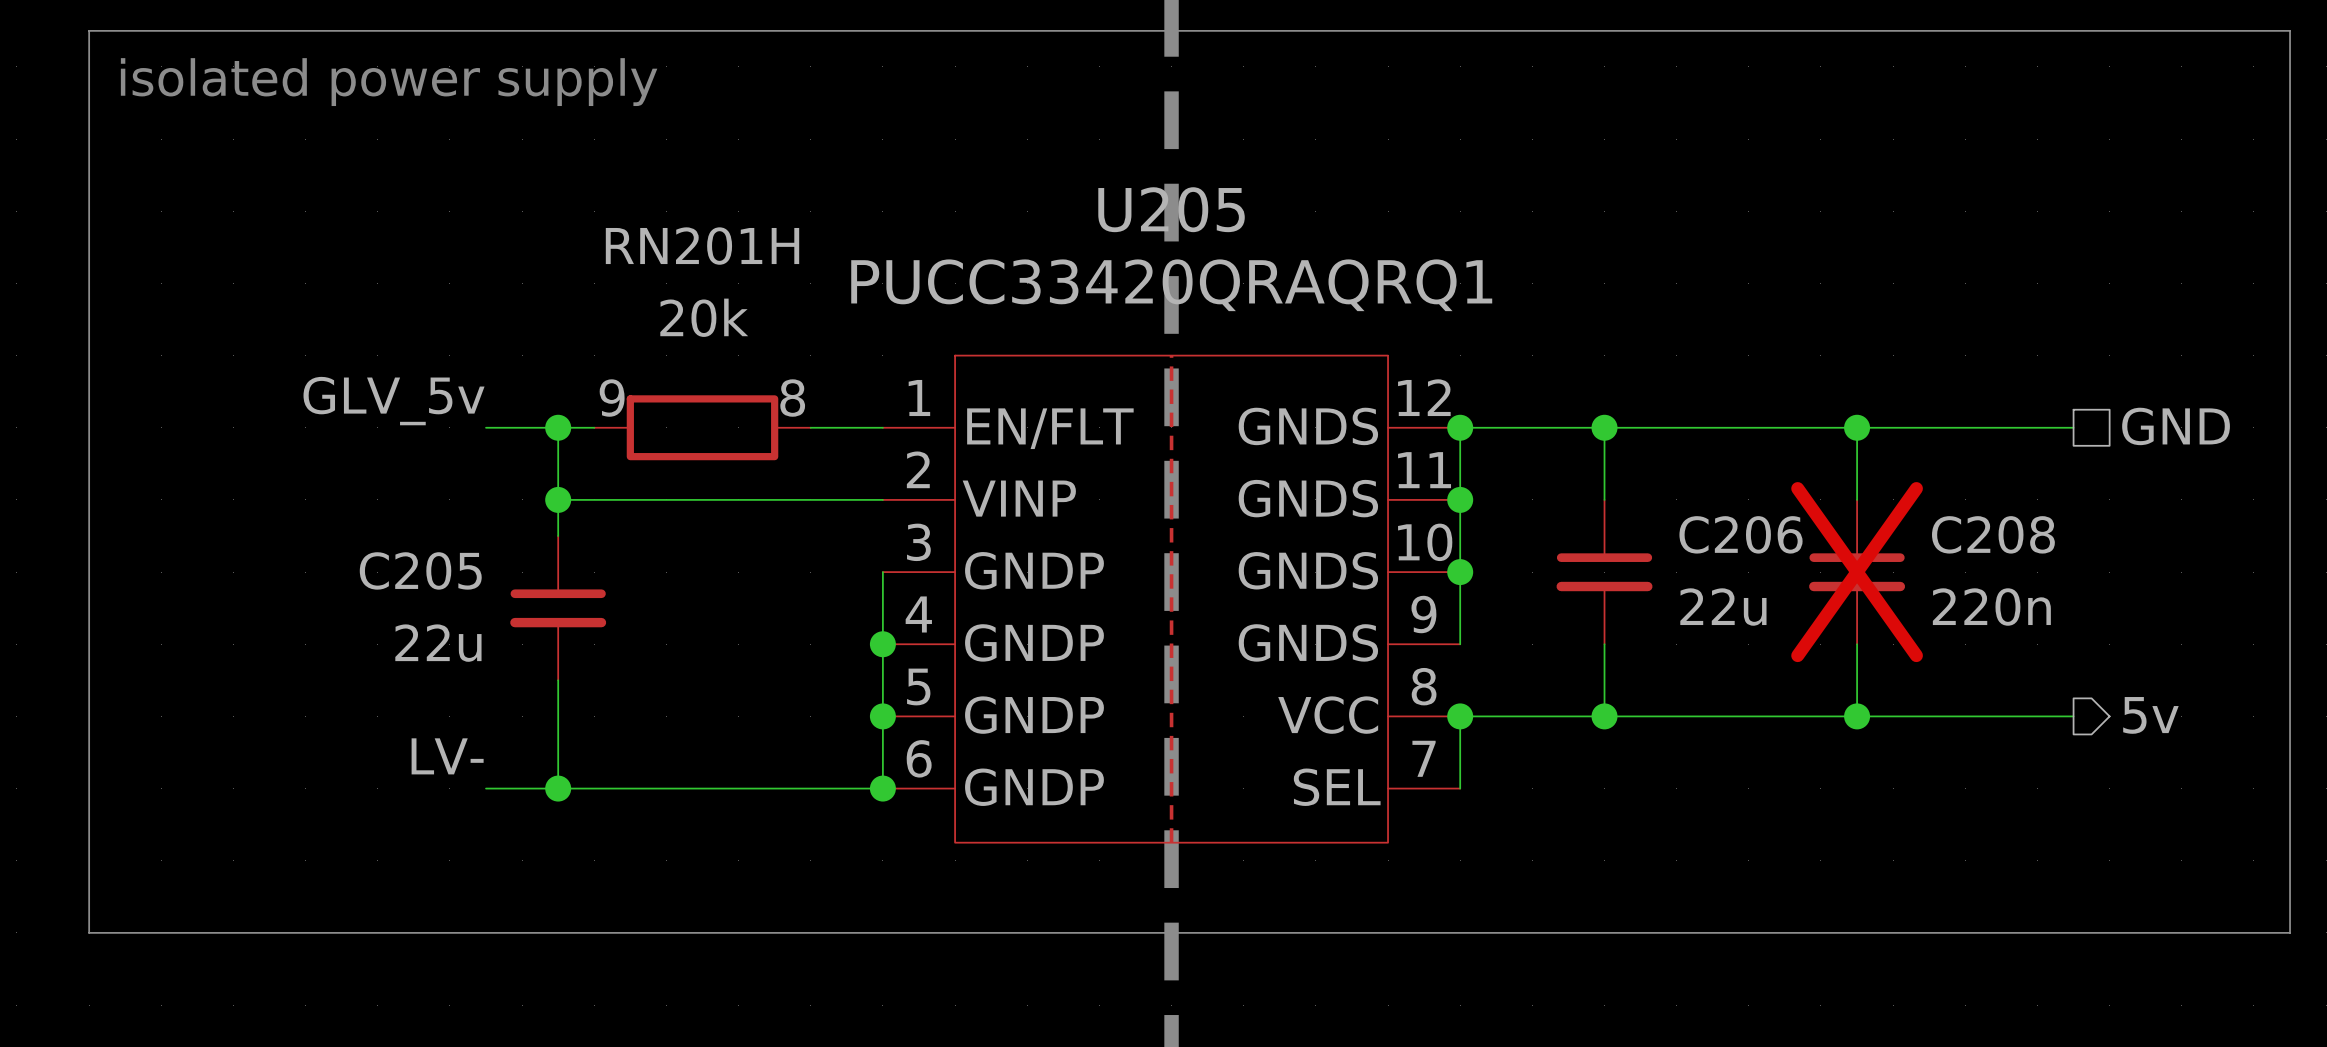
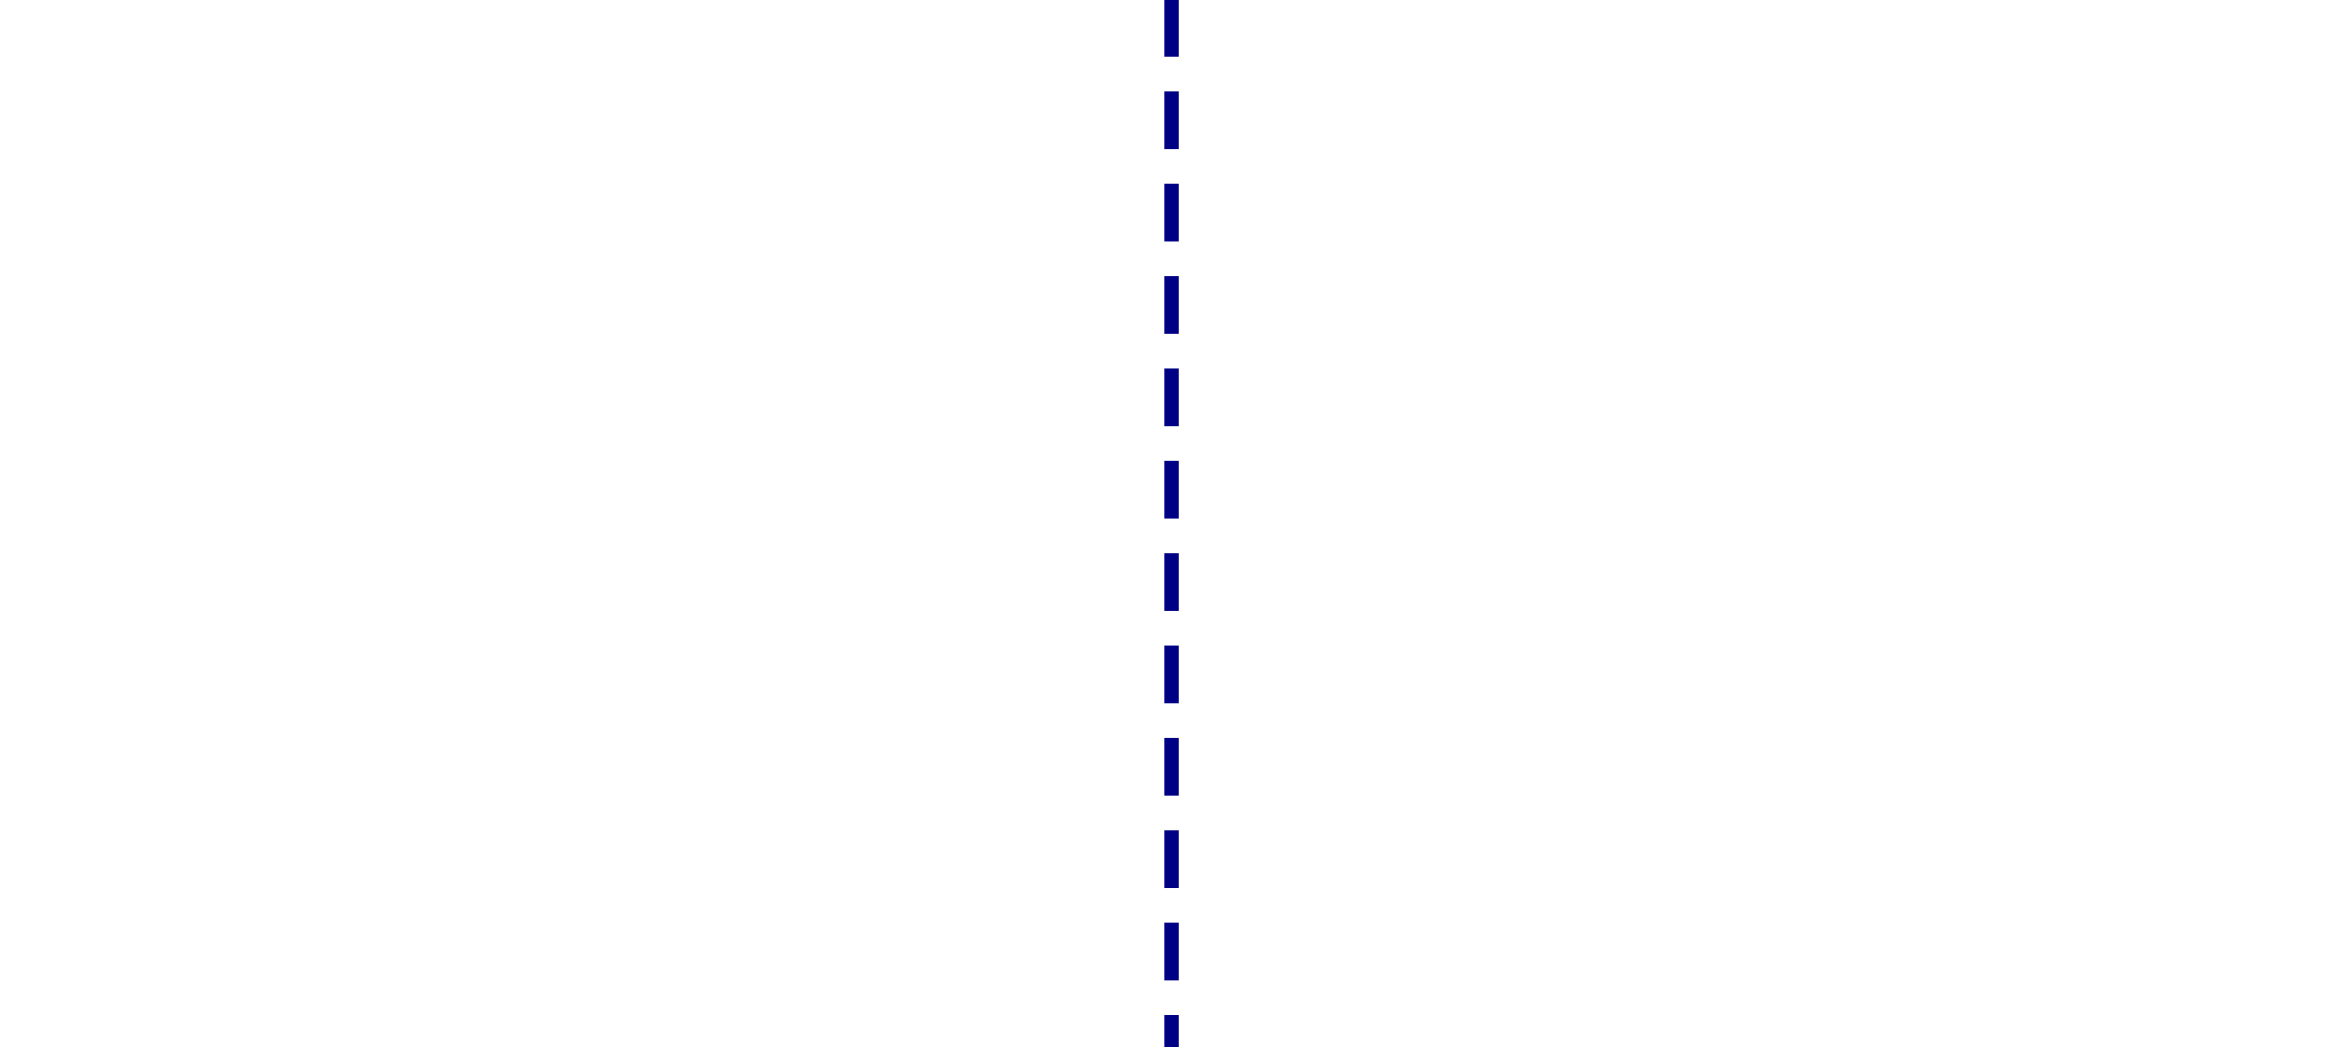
line: (89, 30) (2290, 30) (2290, 932) (89, 932) (89, 30) -> none
text: isolated power supply (389, 82) -> none
label: GLV_5v (394, 401) -> none
hierarchical label: GND (2176, 426) -> none
wire: (486, 427) (594, 427) -> none
wire: (558, 427) (558, 536) -> none
junction: (558, 427) -> none
RN201H: 20k (702, 427) -> none
wire: (810, 427) (882, 427) -> none
junction: (1460, 427) -> none
wire: (1604, 427) (1604, 499) -> none
junction: (1604, 427) -> none
wire: (1857, 427) (1857, 499) -> none
junction: (1857, 427) -> none
wire: (2073, 427) (1460, 427) (1460, 644) -> none
wire: (558, 499) (882, 499) -> none
junction: (558, 499) -> none
junction: (1460, 499) -> none
wire: (882, 572) (882, 788) (486, 788) -> none
junction: (1460, 572) -> none
C206: 22u (1604, 572) -> none
C208: 220n (1857, 572) -> none
U205: PUCC33420QRAQRQ1 (1171, 599) -> none
C205: 22u (558, 608) -> none
junction: (882, 644) -> none
wire: (1604, 644) (1604, 716) -> none
wire: (1857, 644) (1857, 716) -> none
wire: (558, 680) (558, 788) -> none
hierarchical label: 5v (2150, 715) -> none
junction: (882, 716) -> none
junction: (1460, 716) -> none
junction: (1604, 716) -> none
junction: (1857, 716) -> none
wire: (2073, 716) (1460, 716) (1460, 788) -> none
label: LV- (447, 756) -> none
junction: (558, 788) -> none
junction: (882, 788) -> none

